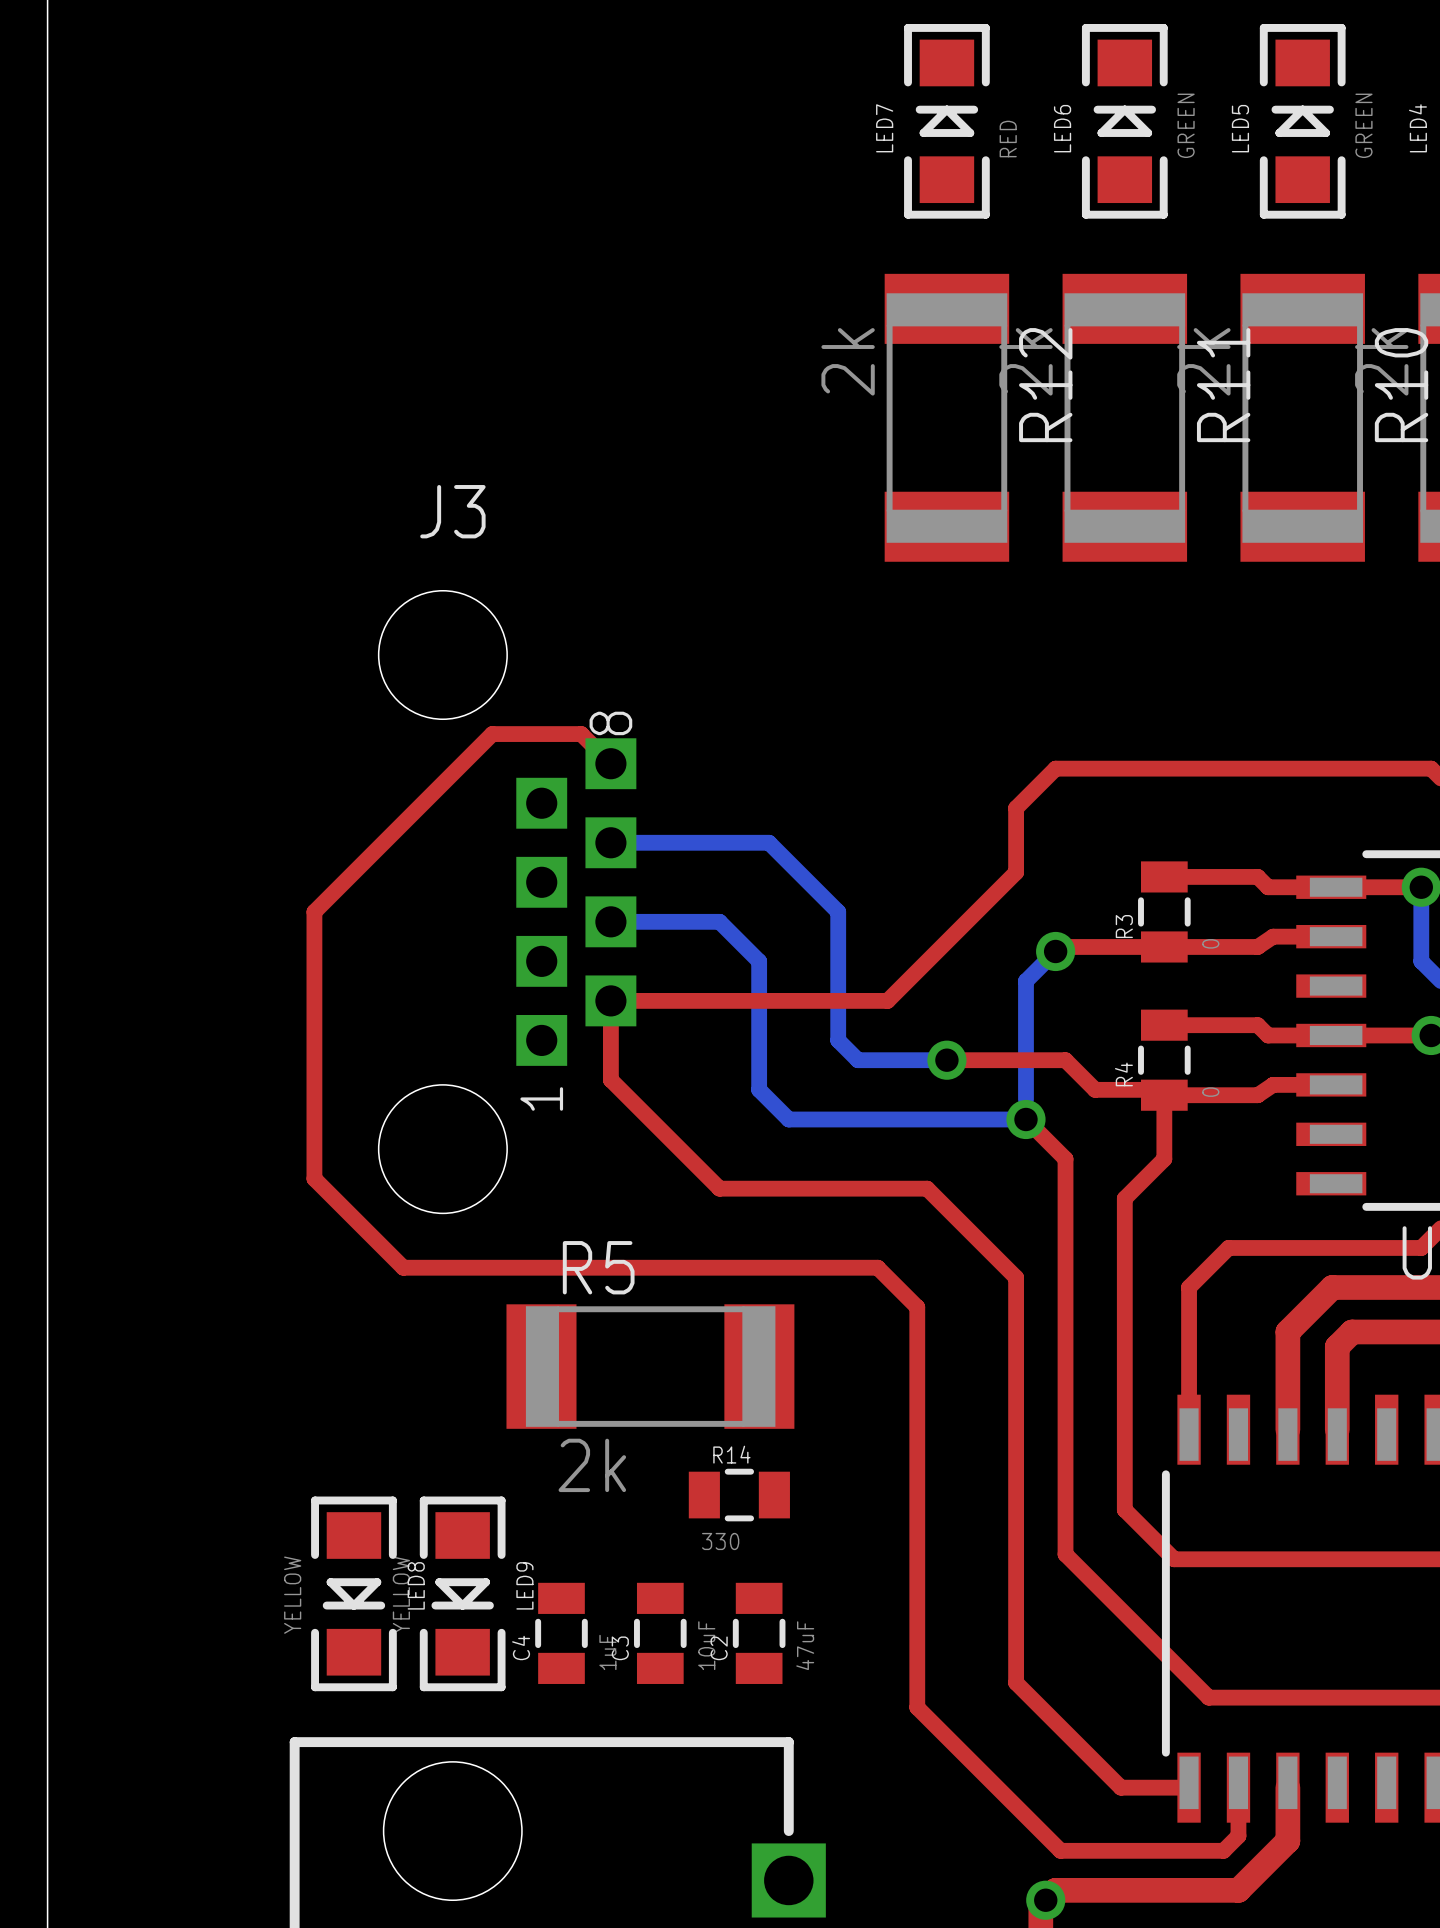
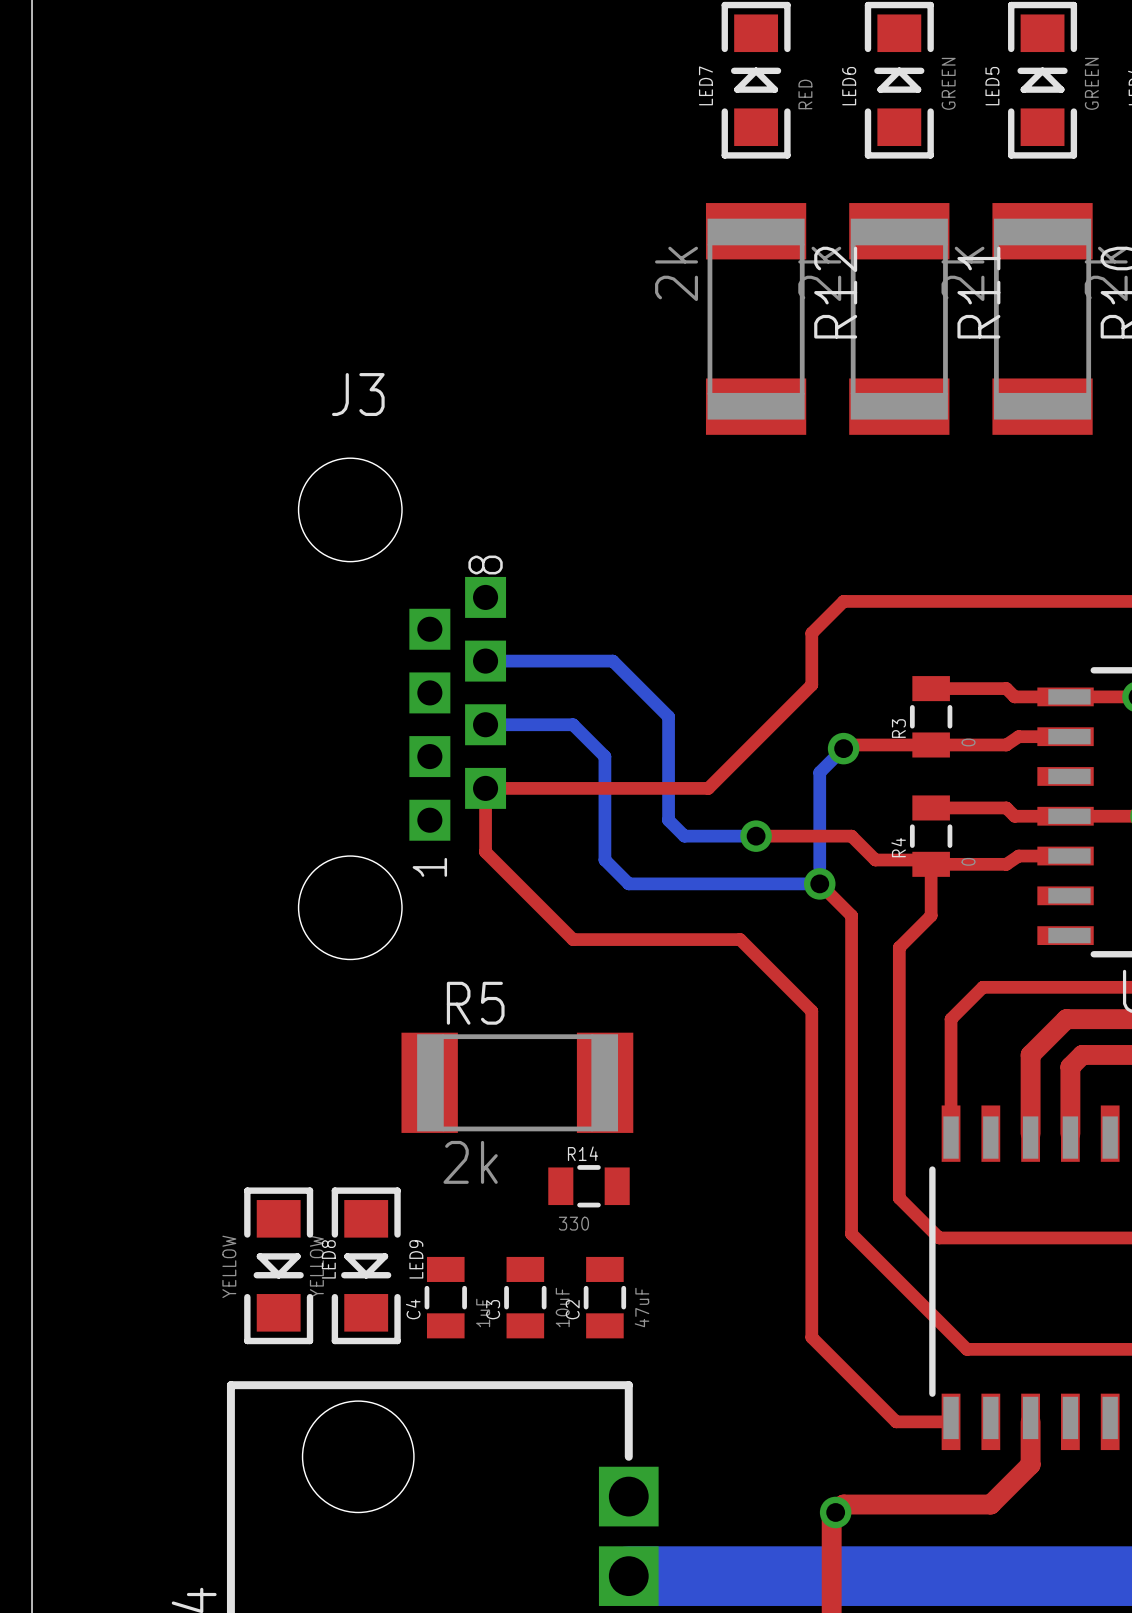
top track: (610, 763) (581, 734) (492, 734) (314, 911) (314, 1178) (403, 1267) (877, 1267) (917, 1307) (917, 1707) (1060, 1850) (1223, 1850) (1238, 1836) (1238, 1787) -> none

